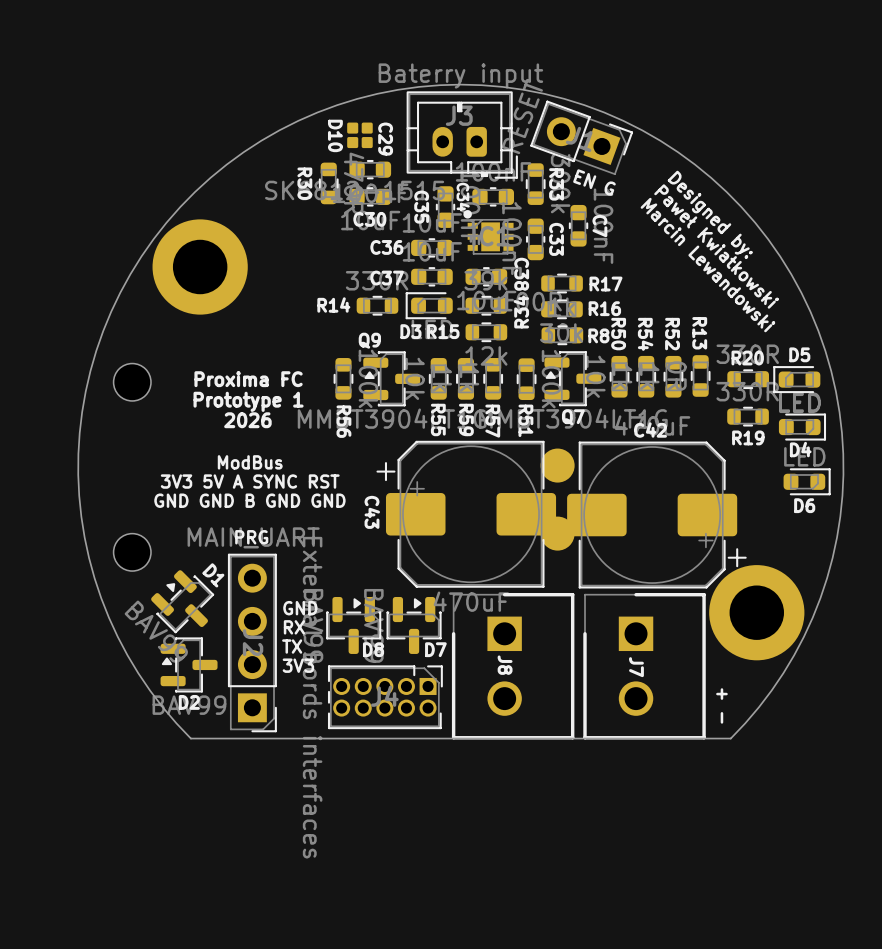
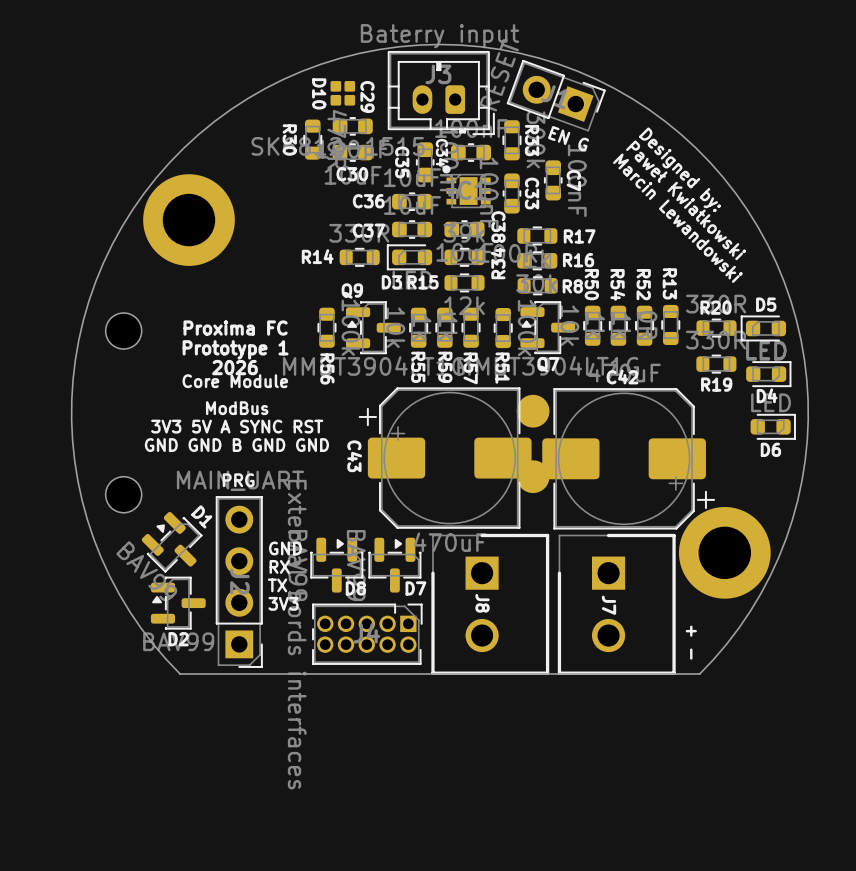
text: none -> Core Module (235, 381)

